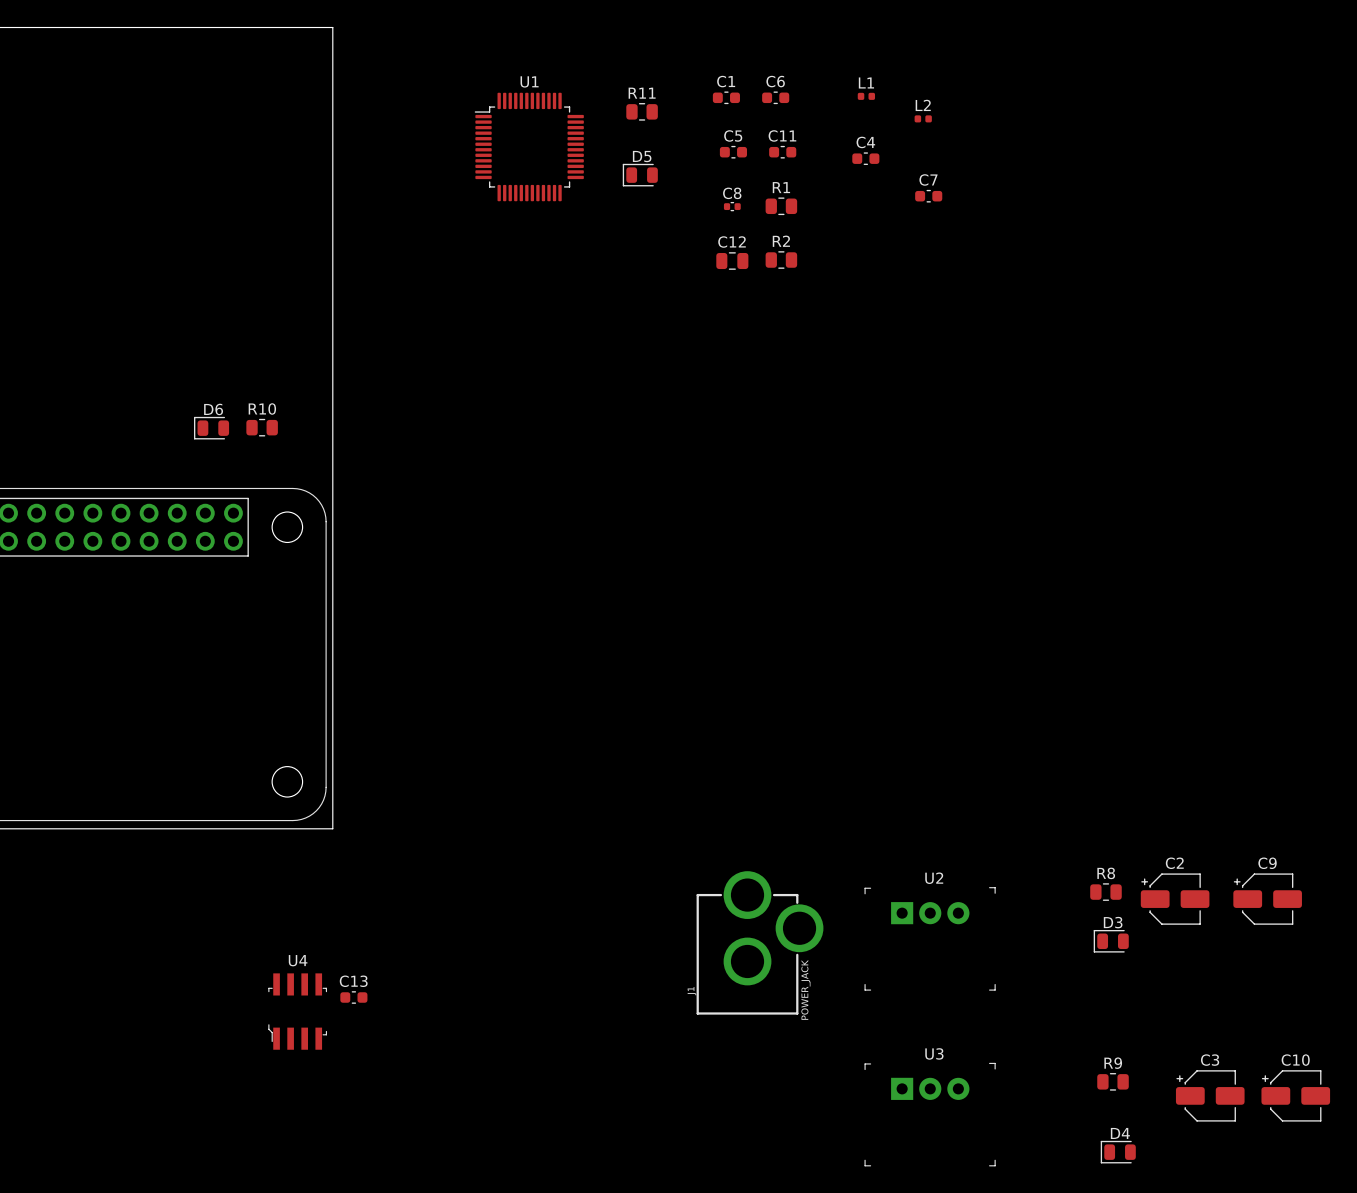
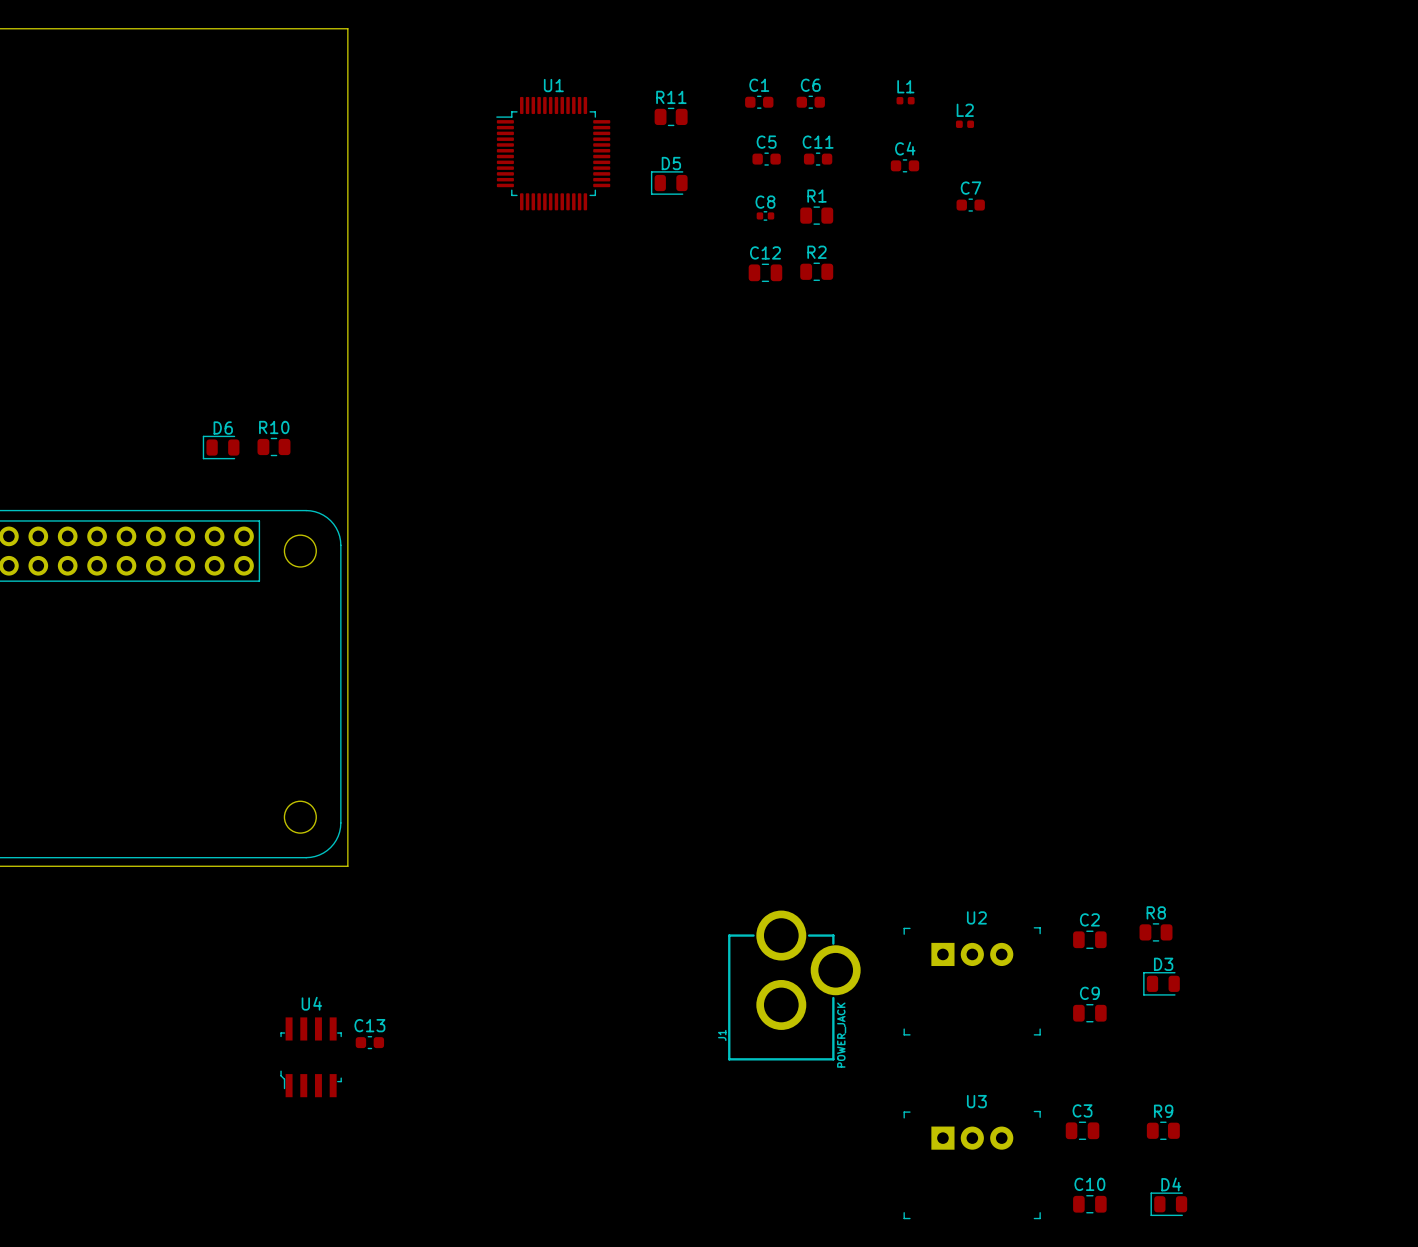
C2 footprint: [1140, 873, 1210, 925] -> [1073, 930, 1107, 949]
C9 footprint: [1233, 873, 1302, 925] -> [1073, 1004, 1107, 1023]
C3 footprint: [1175, 1070, 1245, 1122] -> [1065, 1121, 1100, 1140]
C10 footprint: [1261, 1070, 1331, 1122] -> [1073, 1195, 1107, 1214]

